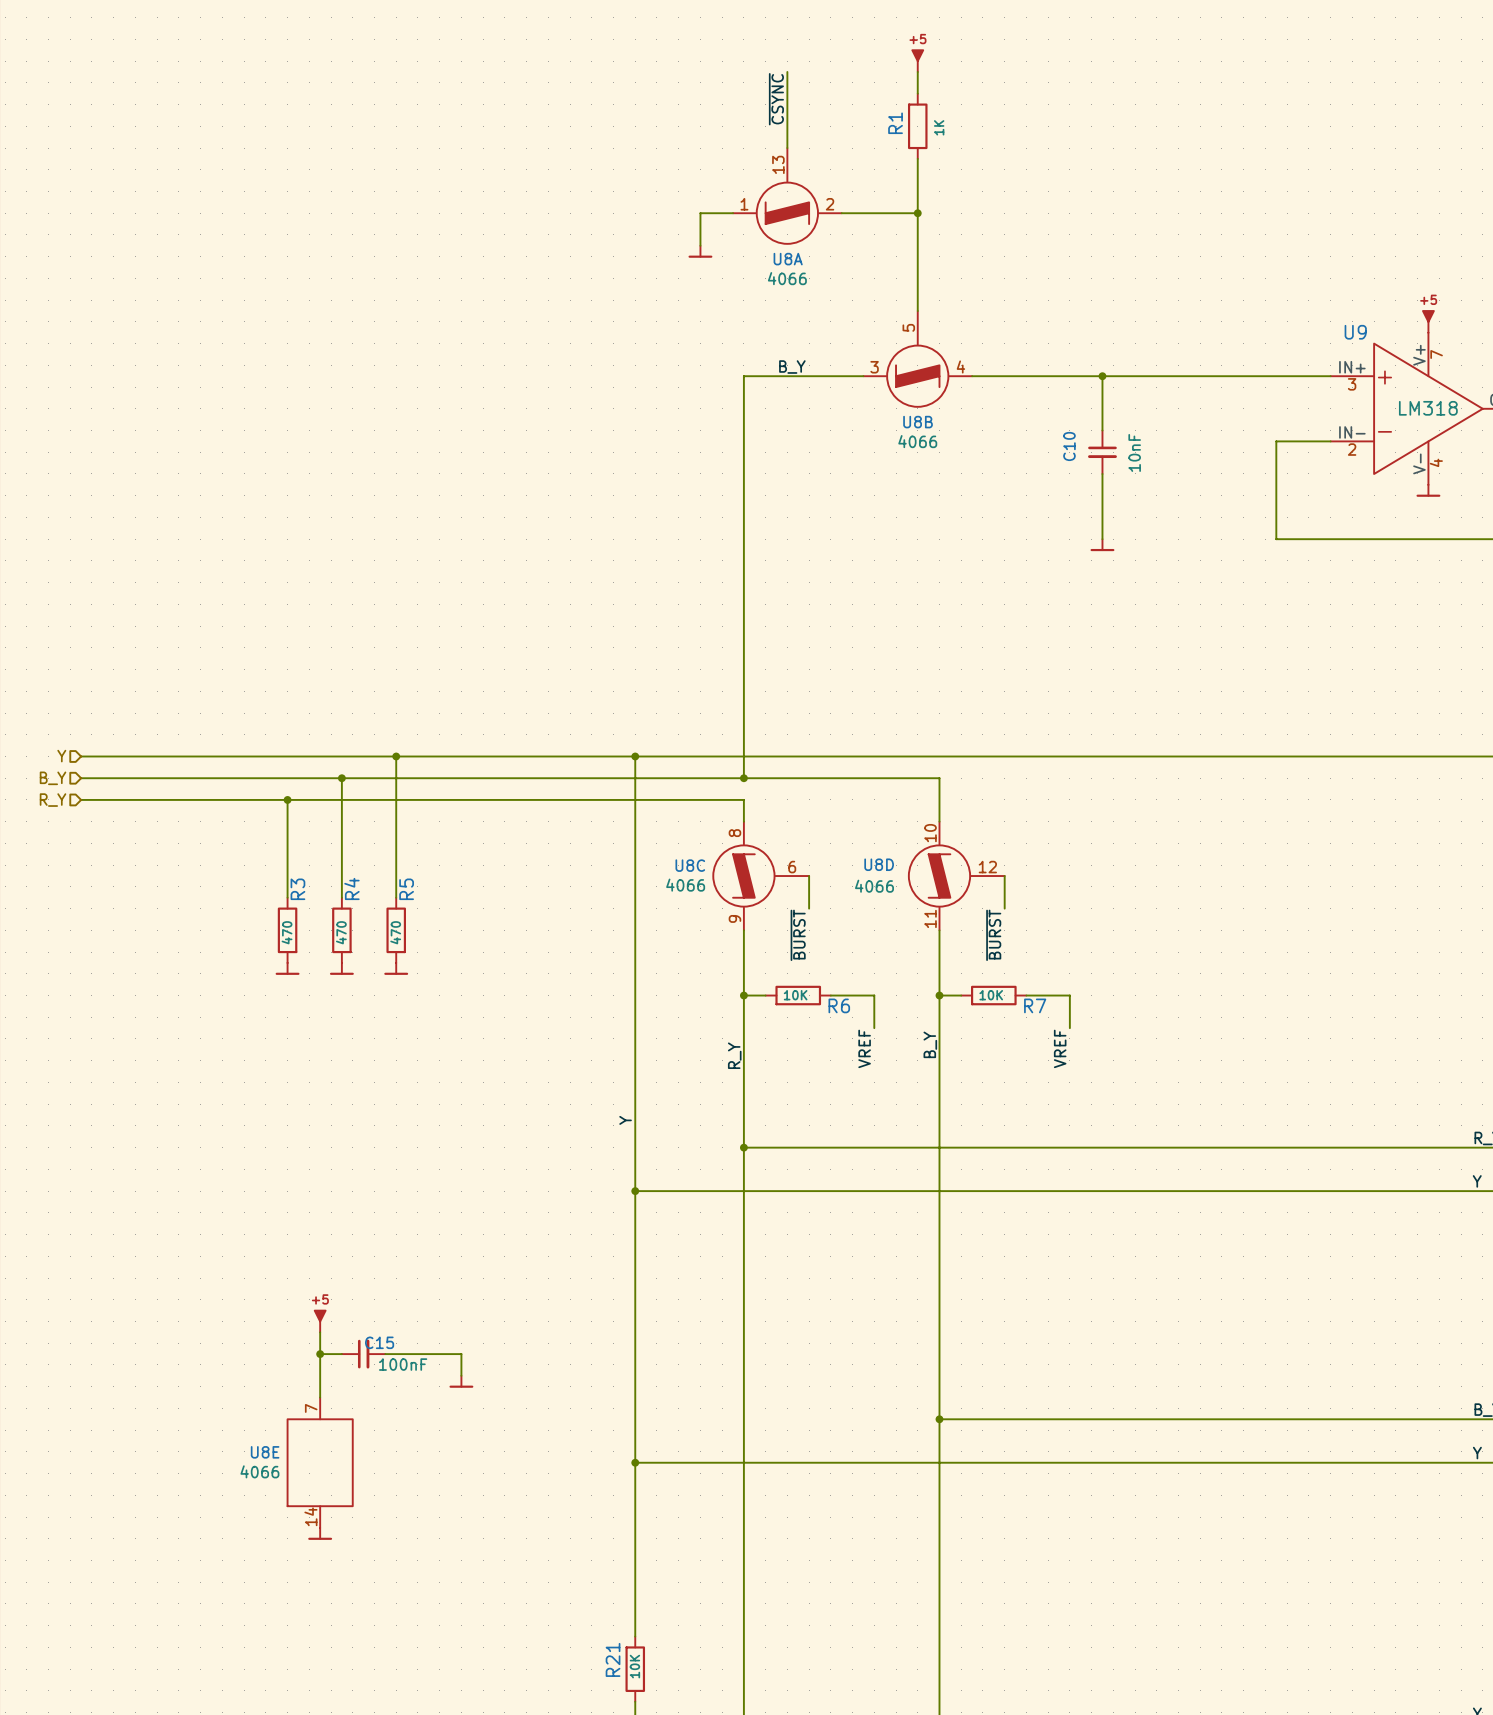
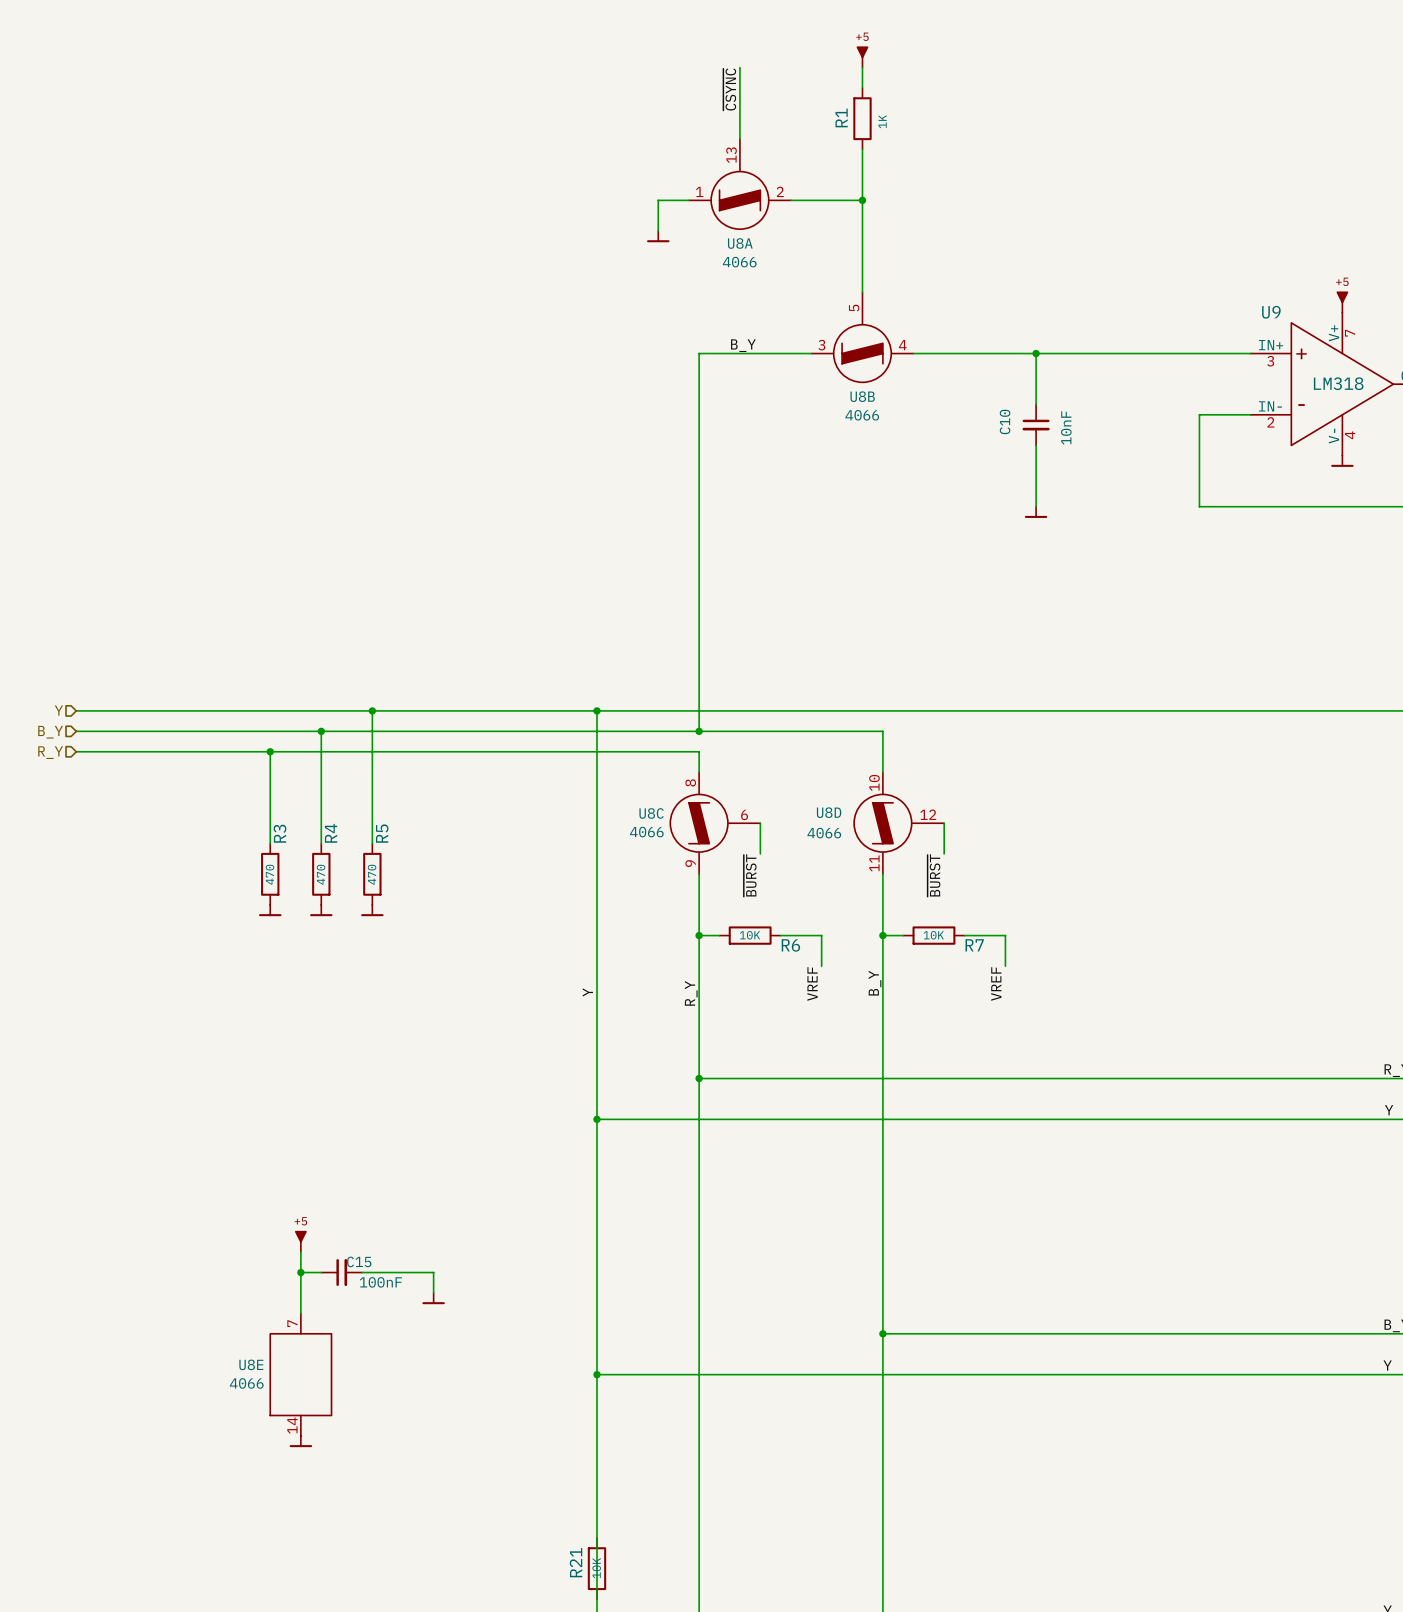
label position: Y (625, 1120) -> Y (587, 992)
wire: none -> (596, 1538) (596, 1599)

